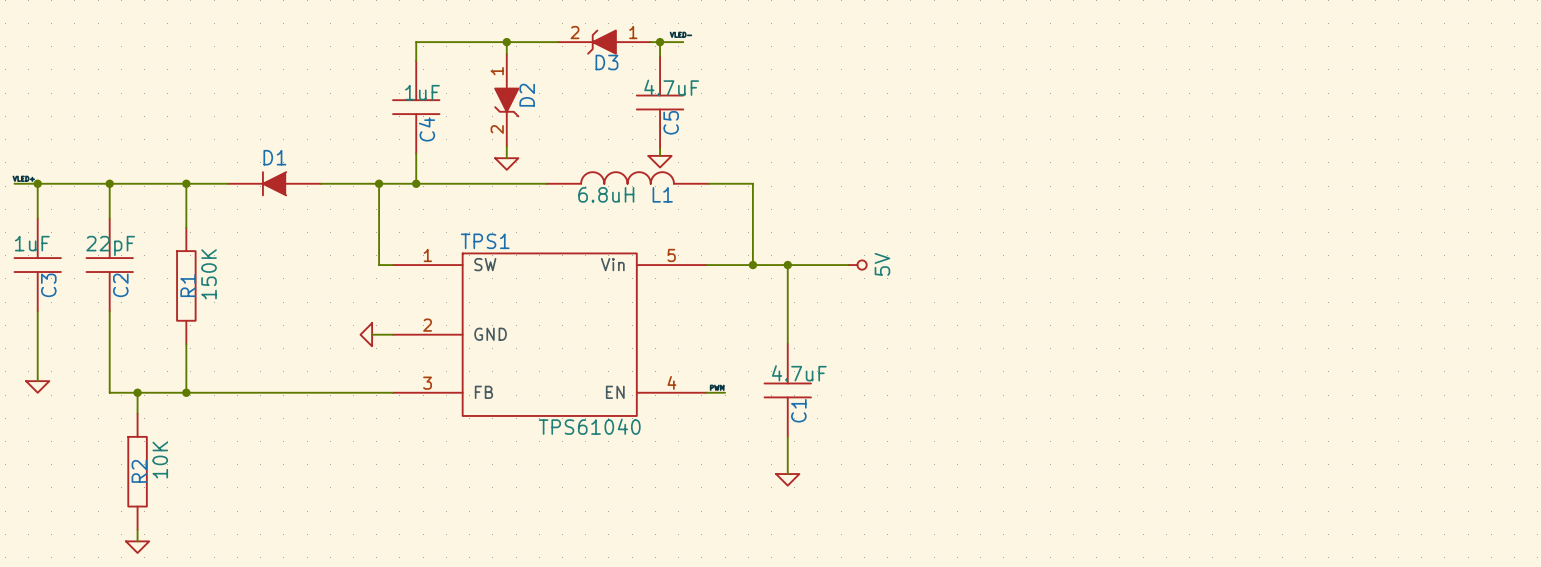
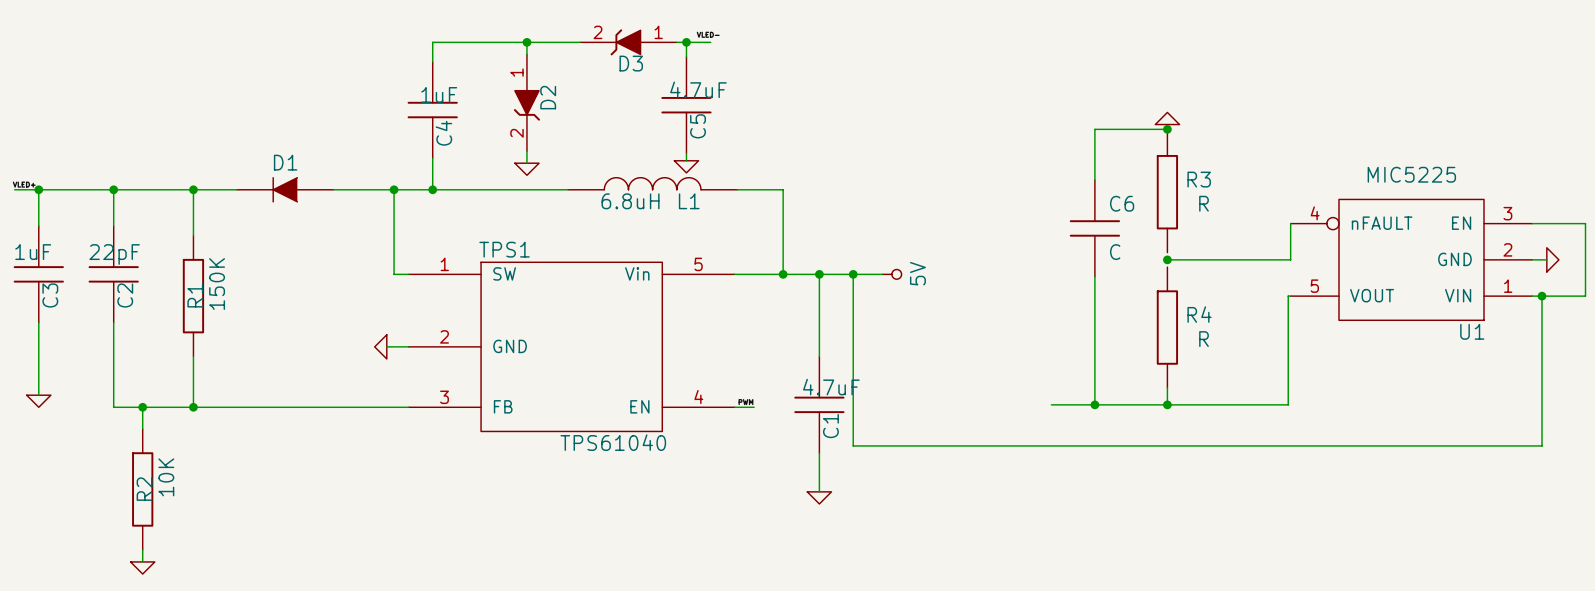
power symbol: none -> (1167, 118)
wire: none -> (1167, 129) (1094, 129) (1094, 180)
junction: none -> (1167, 129)
R3: none -> R (1167, 192)
wire: none -> (1290, 223) (1290, 259) (1167, 259)
wire: none -> (1532, 223) (1585, 223) (1585, 296) (1532, 296)
C6: none -> C (1094, 228)
junction: none -> (1167, 259)
U1: none -> MIC5225 (1411, 259)
wire: none -> (1532, 259) (1546, 259)
power symbol: none -> (1552, 259)
wire: none -> (853, 274) (853, 445) (1542, 445) (1542, 296)
junction: none -> (853, 274)
wire: none -> (1094, 276) (1094, 404)
wire: none -> (1290, 296) (1288, 296) (1288, 404) (1051, 404)
junction: none -> (1542, 296)
R4: none -> R (1167, 327)
wire: none -> (1167, 387) (1167, 404)
junction: none -> (1094, 404)
junction: none -> (1167, 404)

